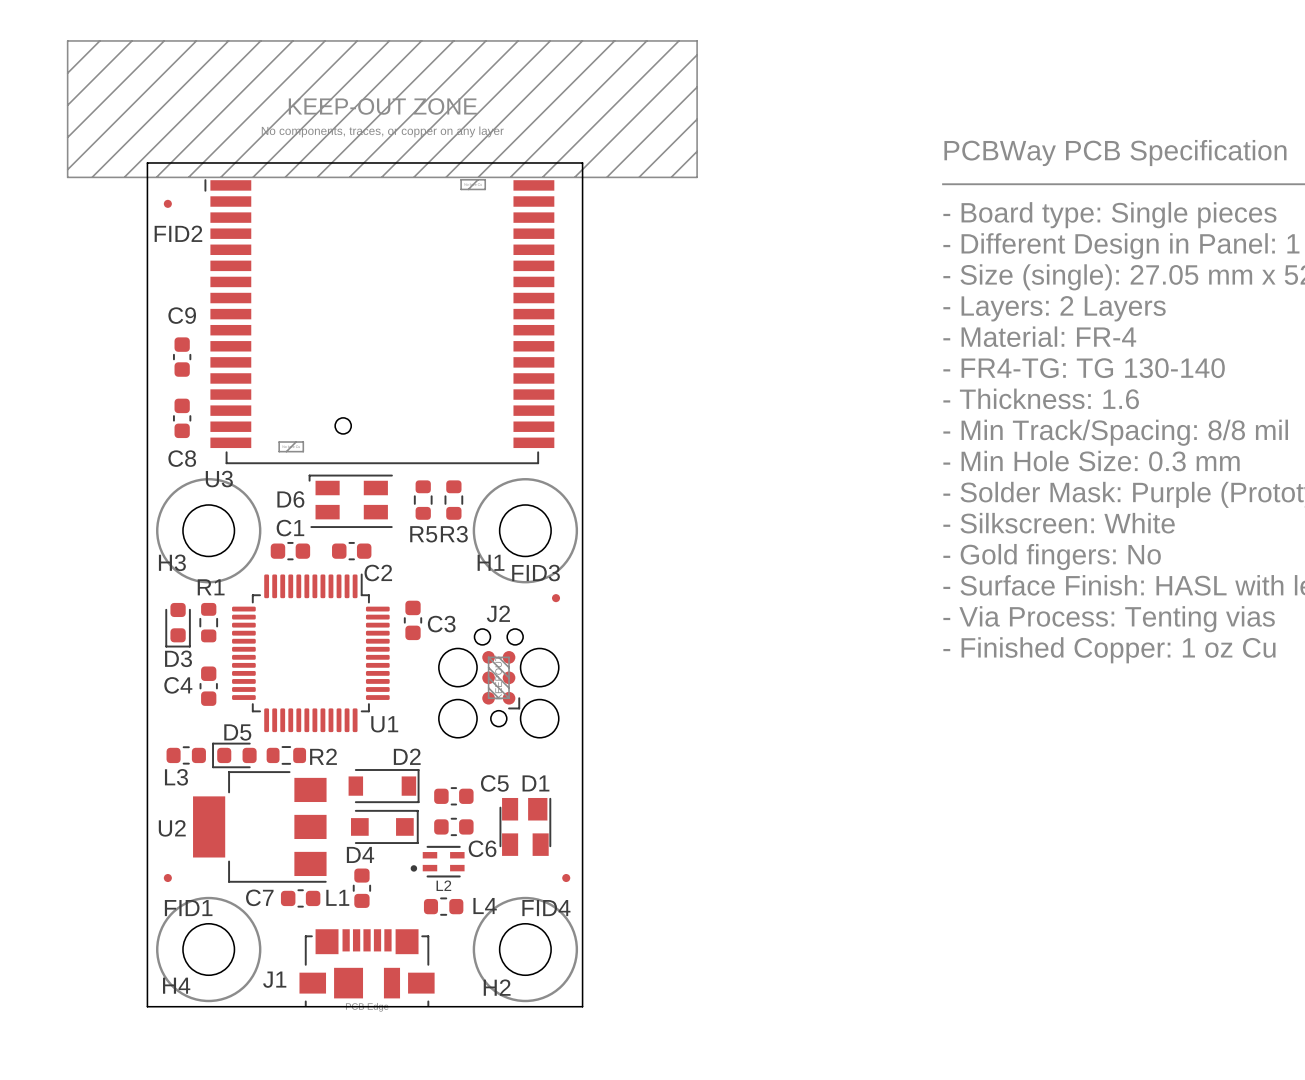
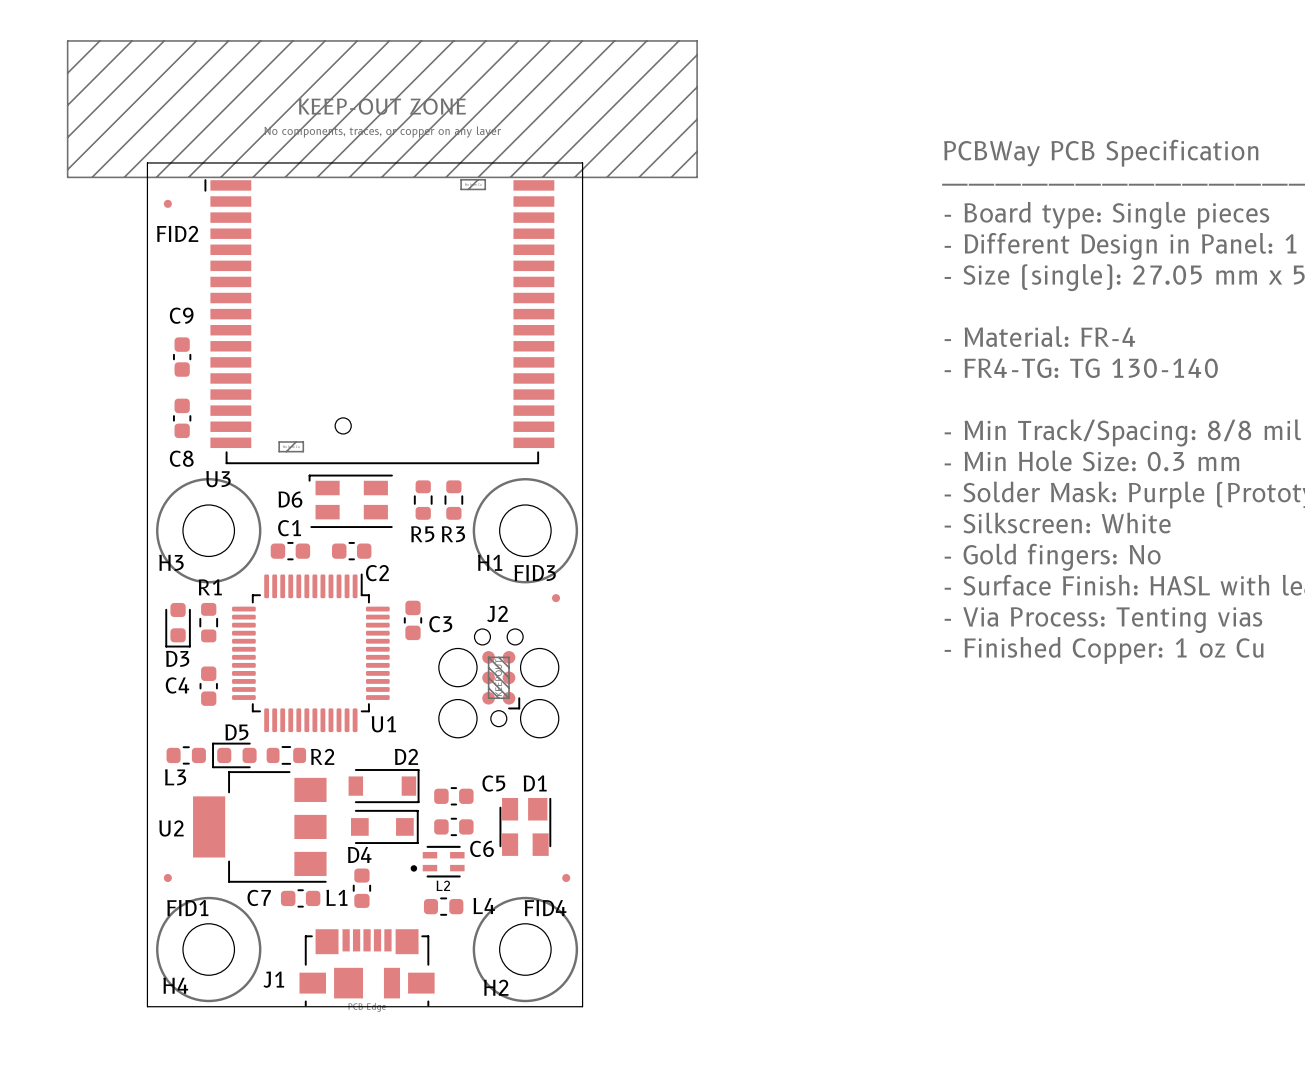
text: - Layers: 2 Layers (1054, 308) -> none
text: - Thickness: 1.6 (1041, 398) -> none

